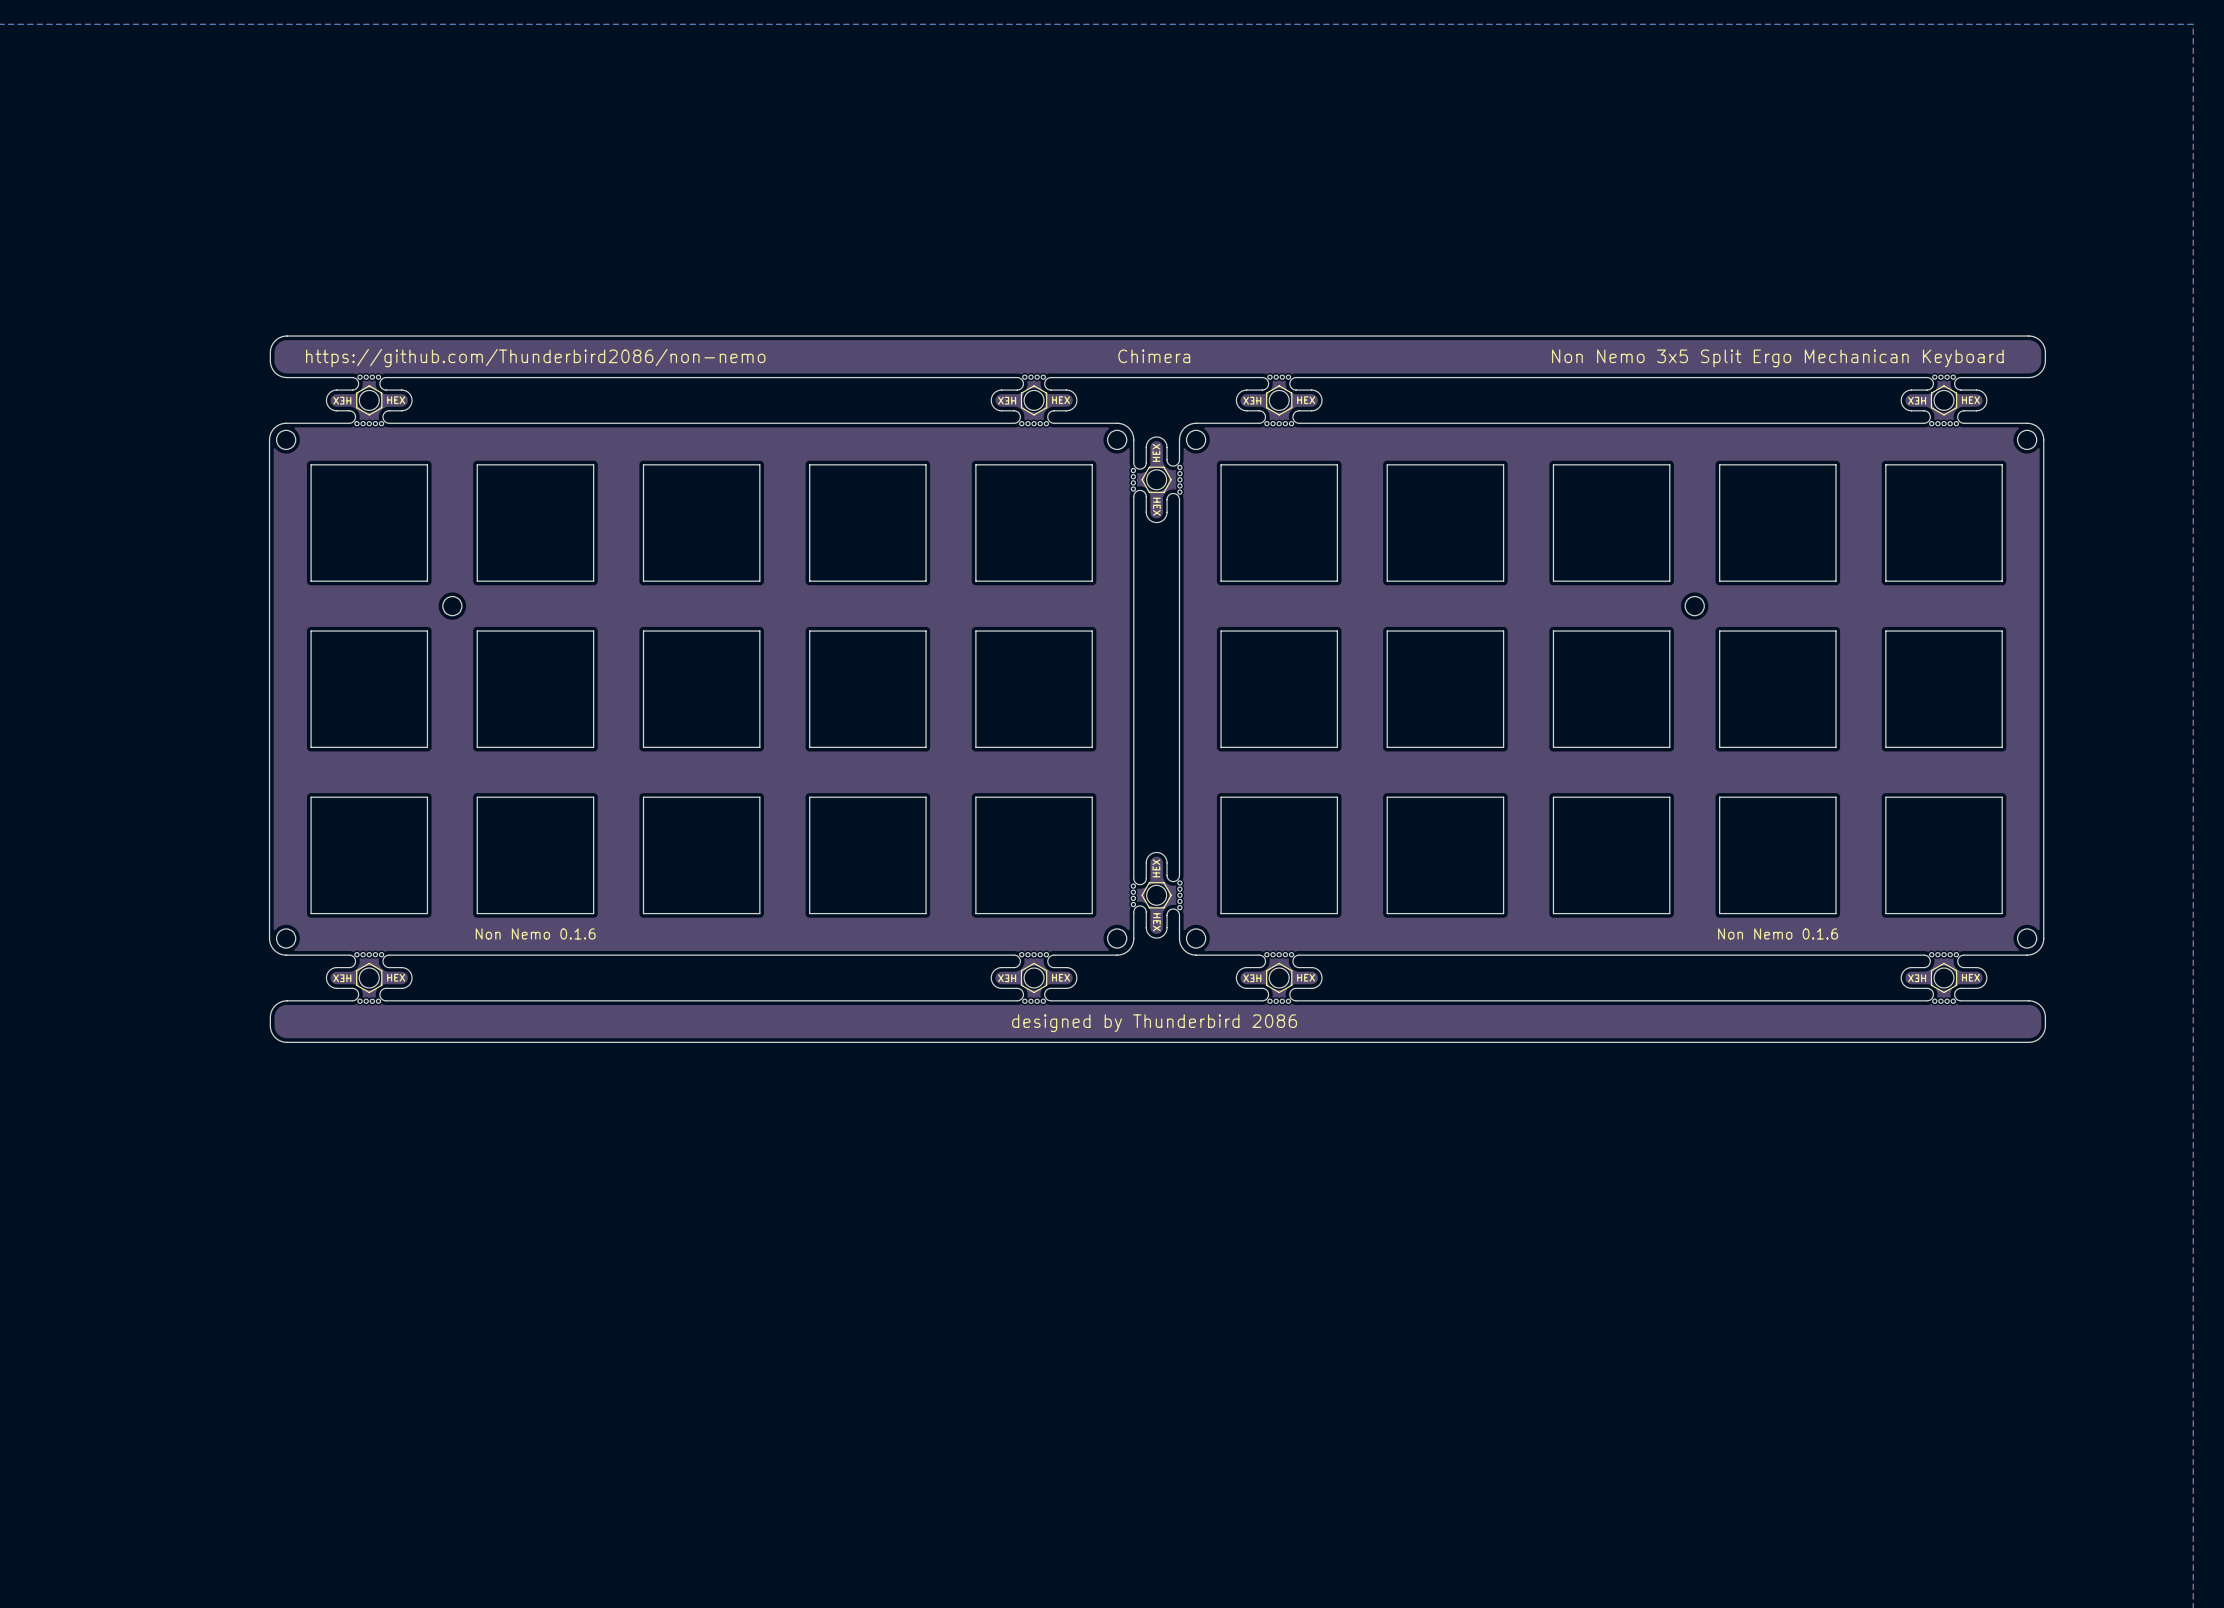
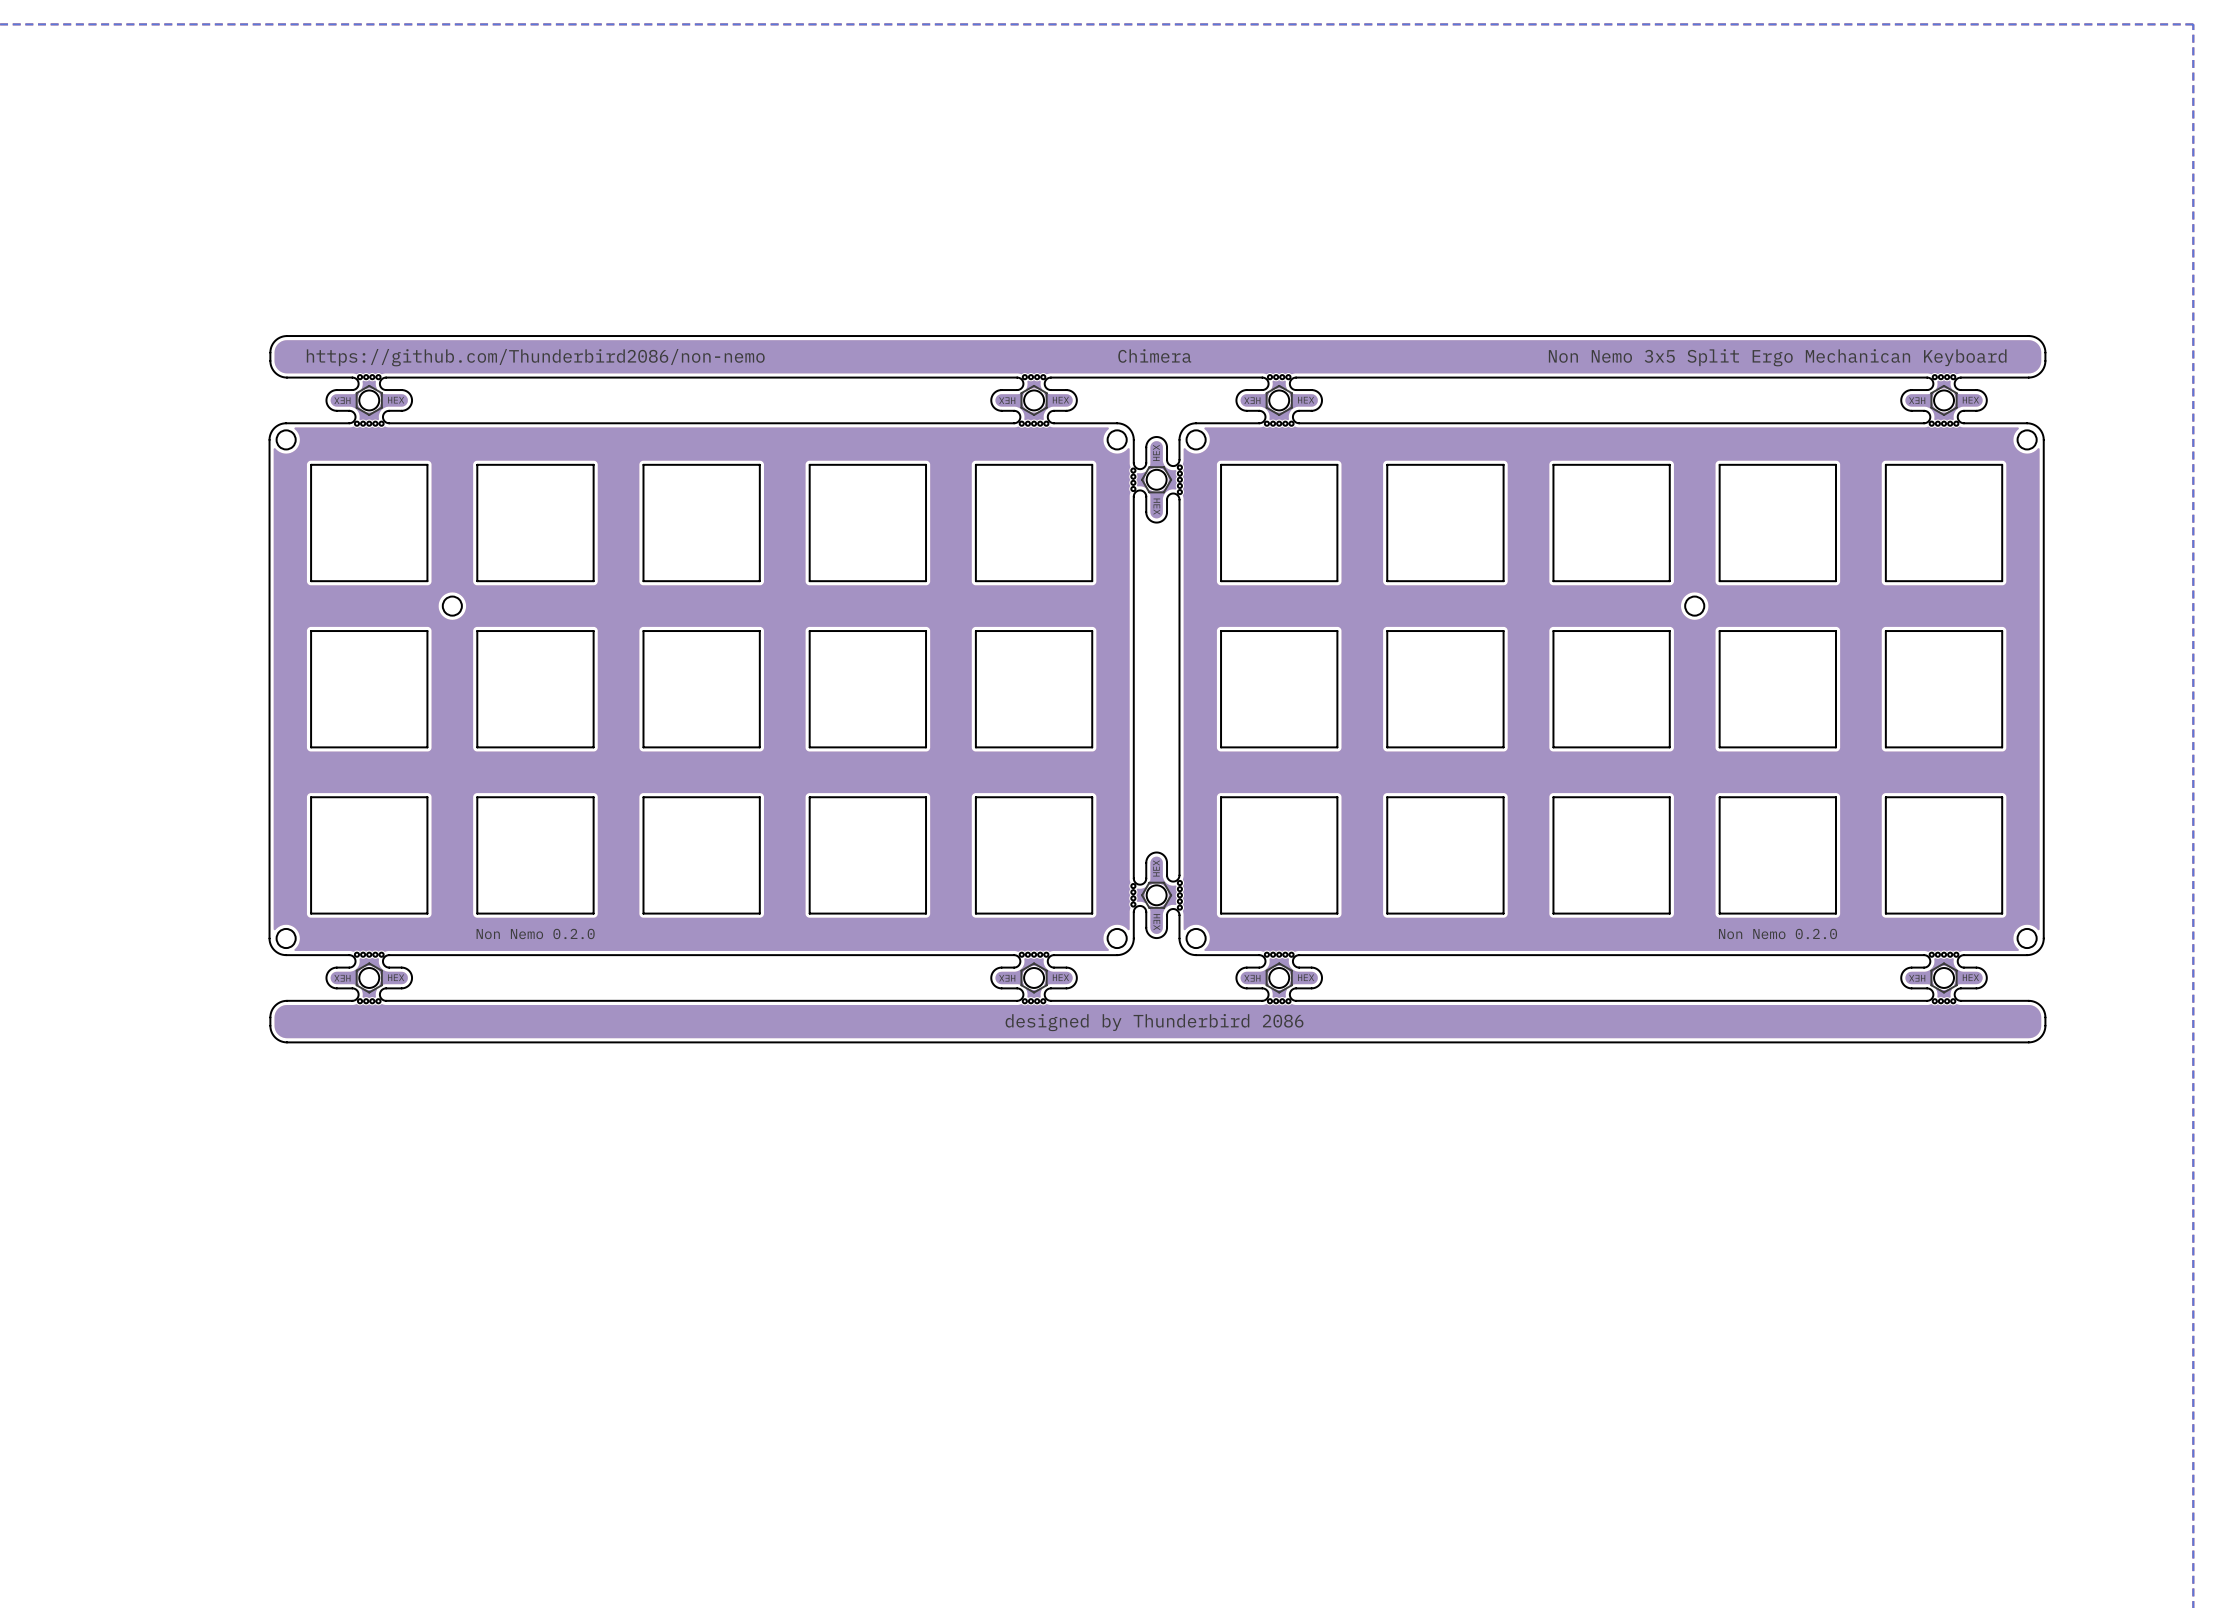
text: Non Nemo 0.1.6 (535, 933) -> Non Nemo 0.2.0 (535, 933)
text: Non Nemo 0.1.6 (1778, 933) -> Non Nemo 0.2.0 (1777, 933)

